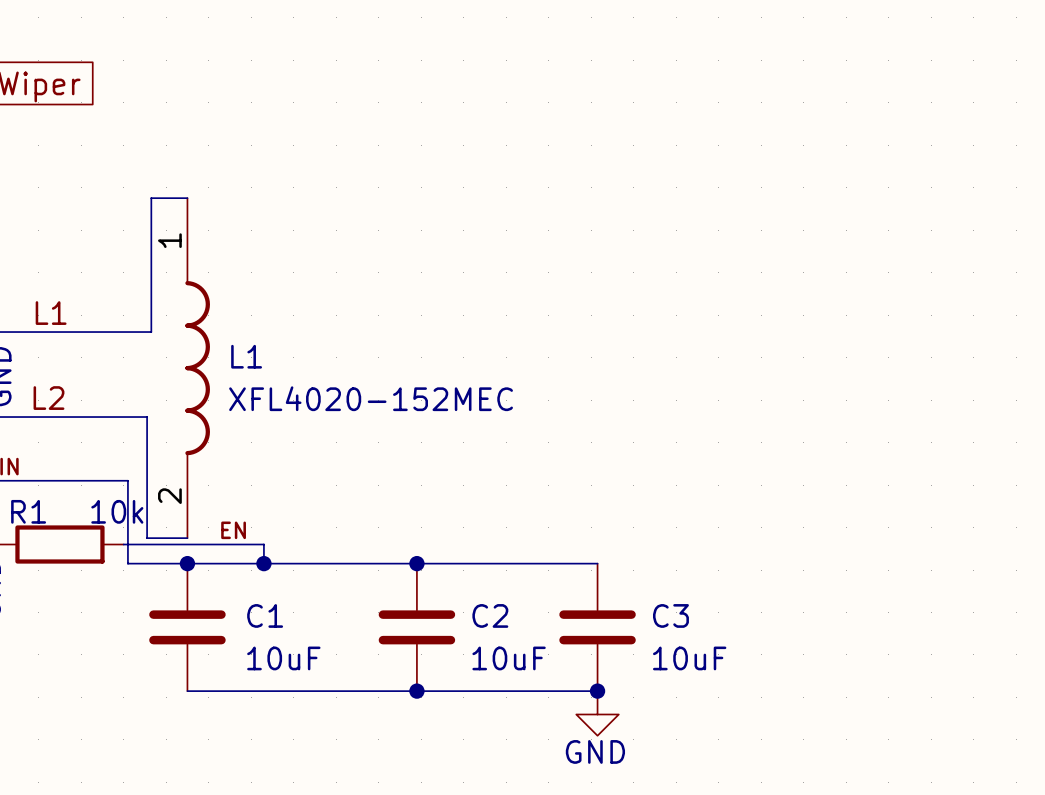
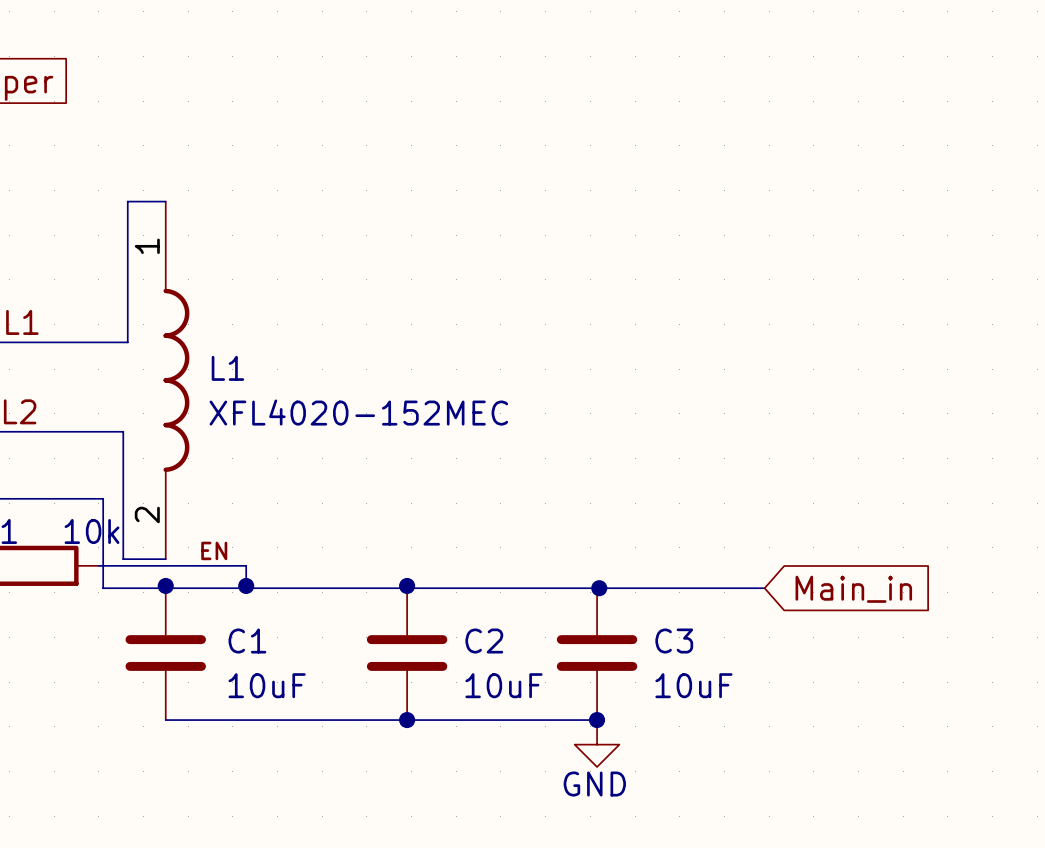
wire: (127, 563) (597, 563) -> (103, 585) (103, 588) (764, 588)
junction: none -> (599, 588)
global label: none -> Main_in (853, 589)

